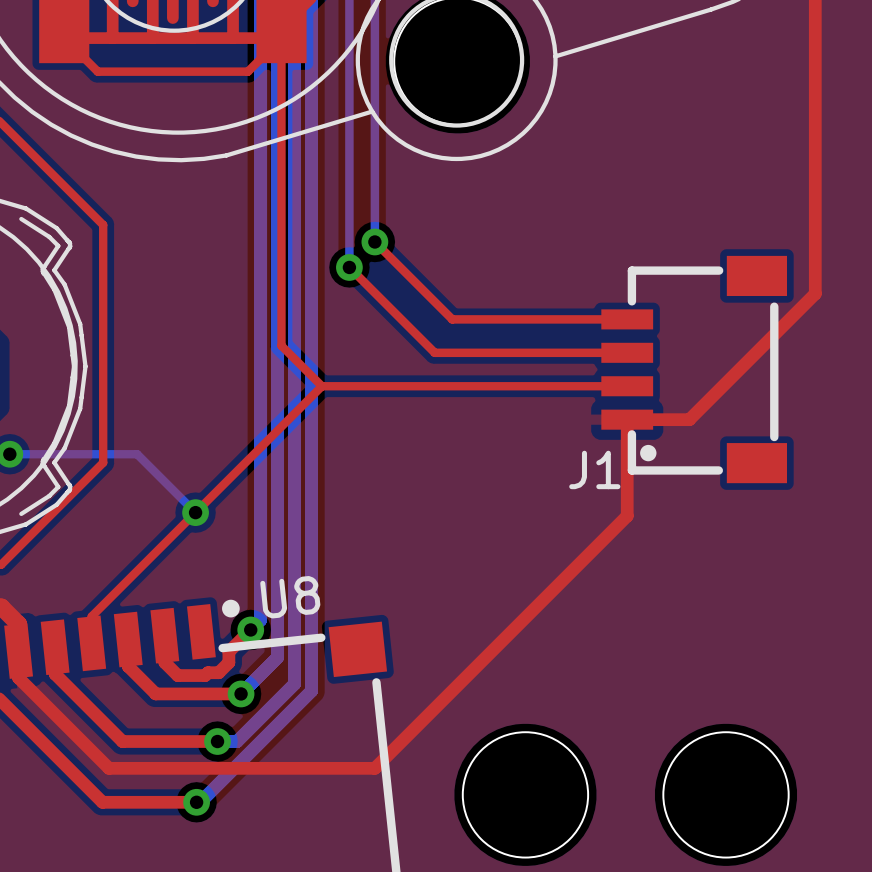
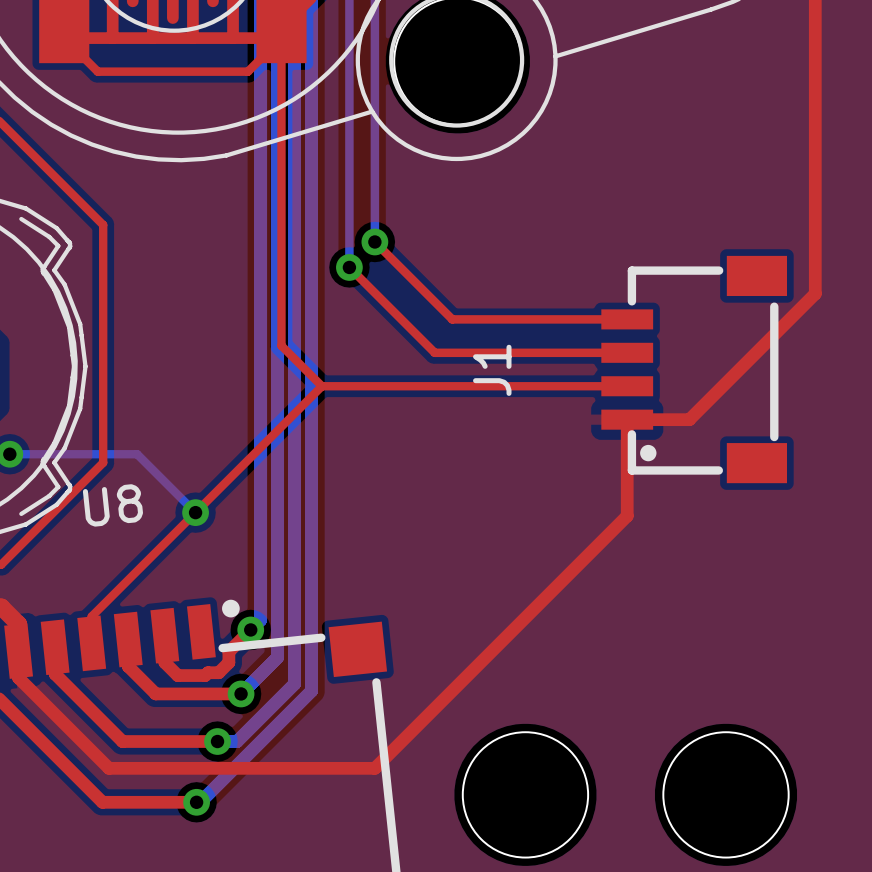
J1 name rotation: 0° (594, 469) -> 90° counterclockwise (492, 370)
J1 name position: J1 (594, 469) -> J1 (492, 370)
U8 name position: U8 (290, 597) -> U8 (112, 505)

